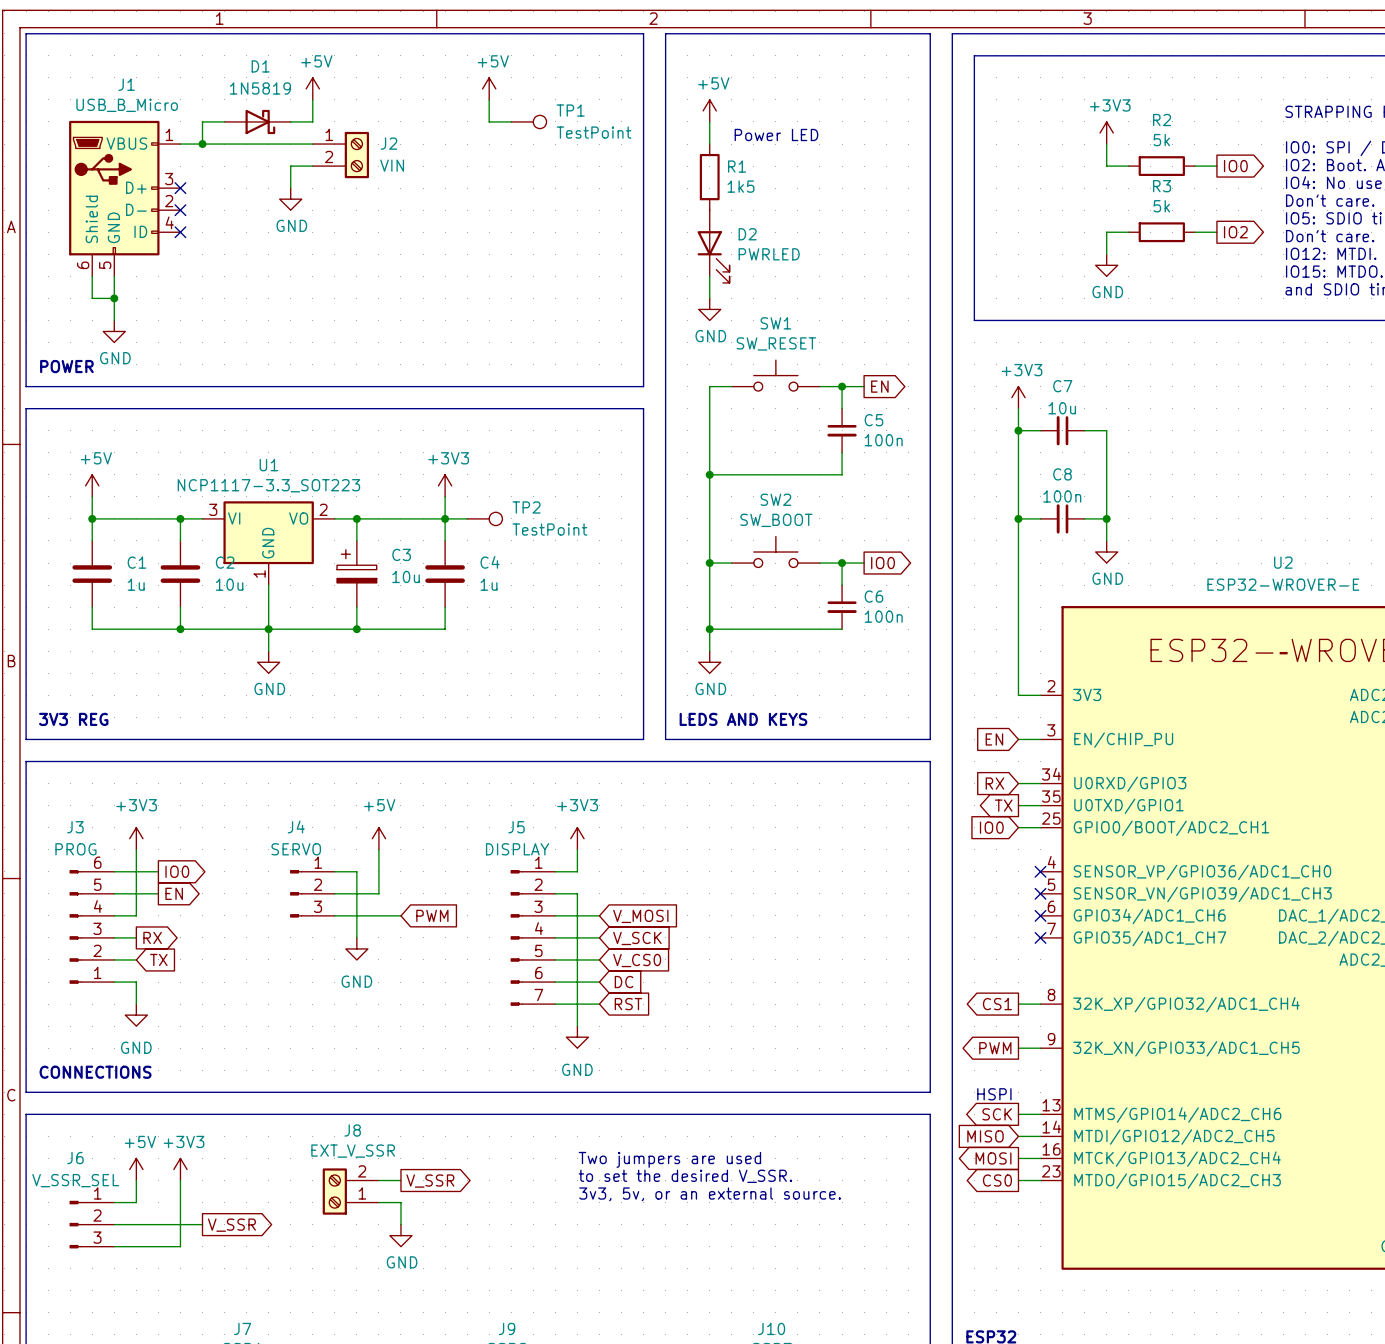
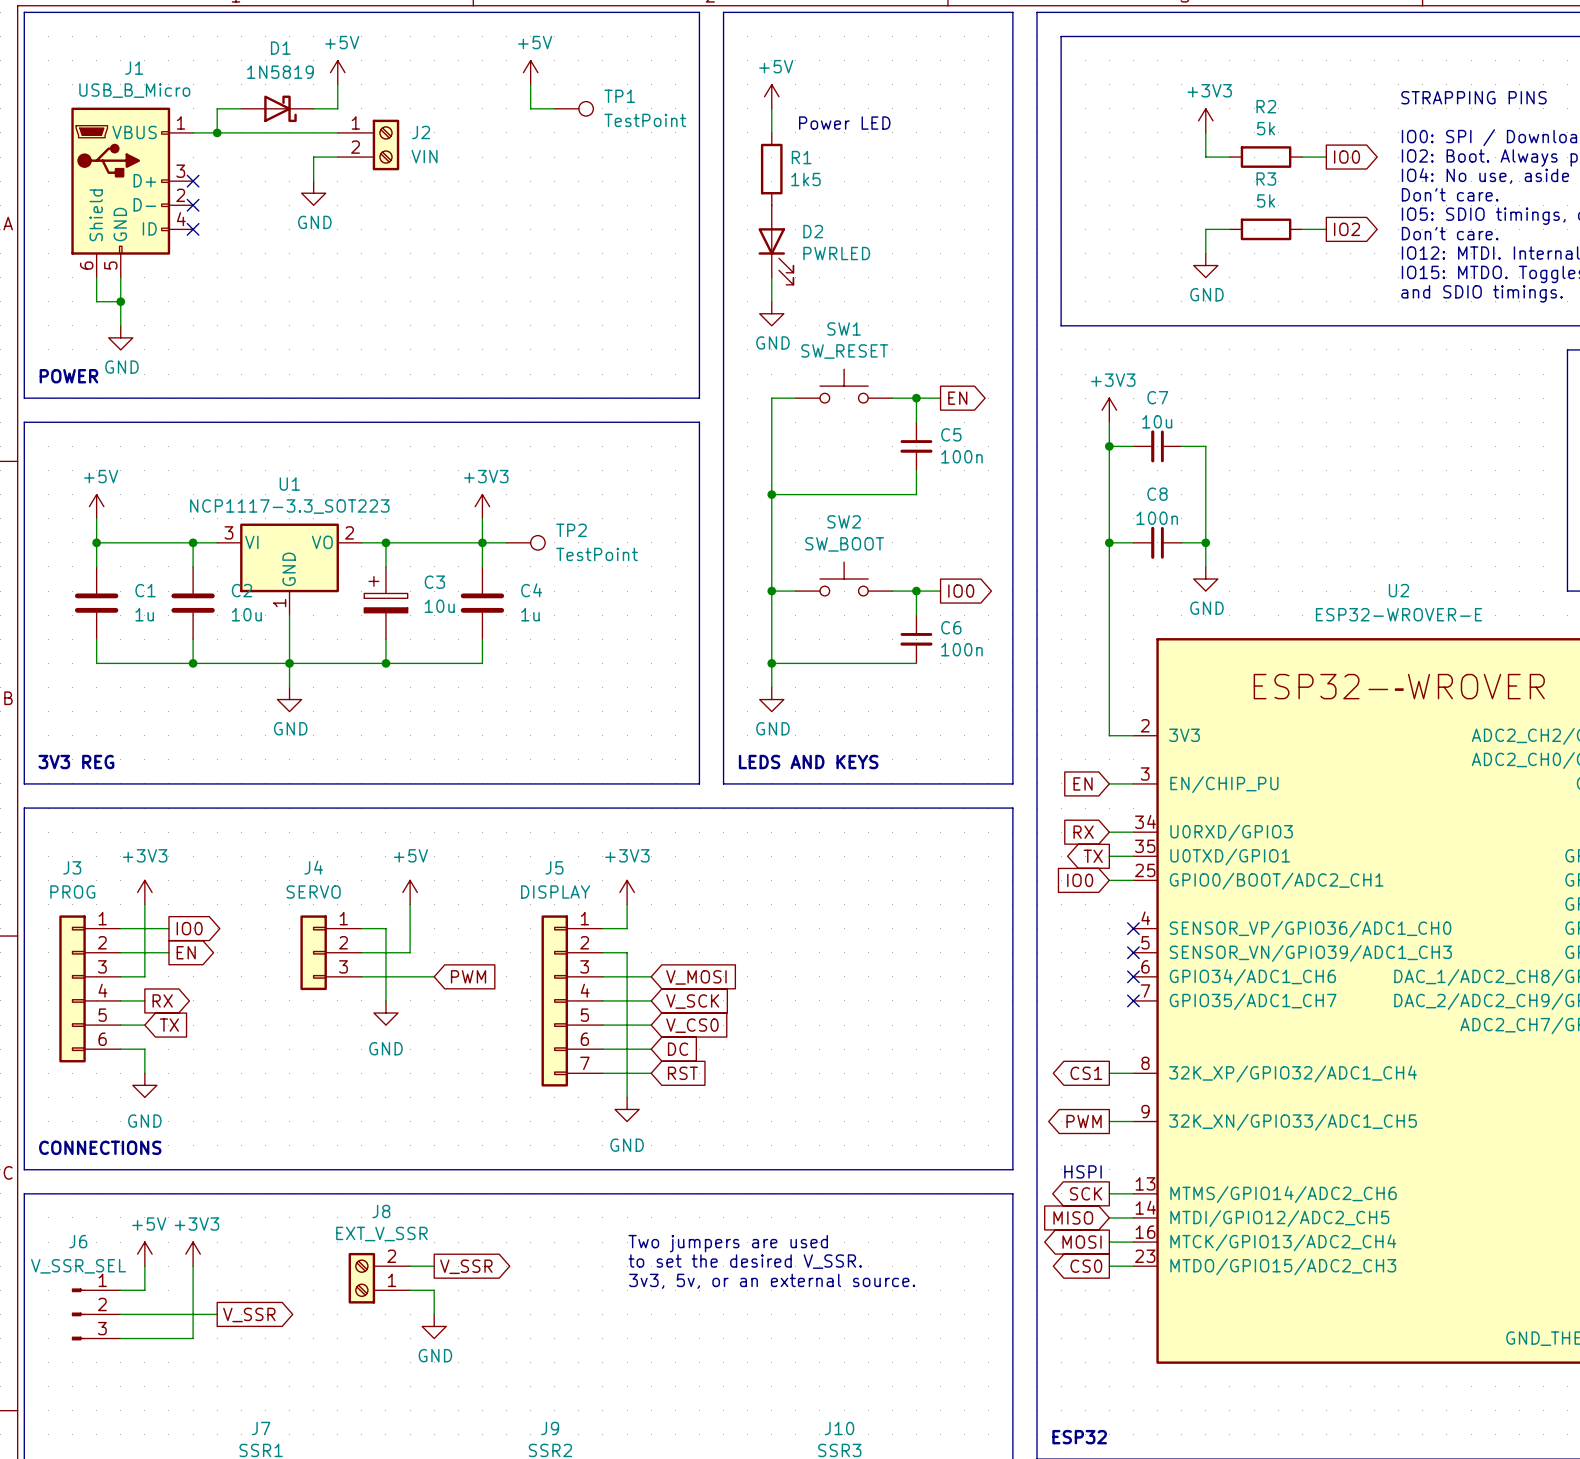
J3 symbol: [69, 870, 115, 984] -> [59, 915, 121, 1063]
J4 symbol: [290, 870, 335, 918] -> [300, 915, 362, 991]
J5 symbol: [510, 870, 556, 1006] -> [541, 915, 603, 1087]

